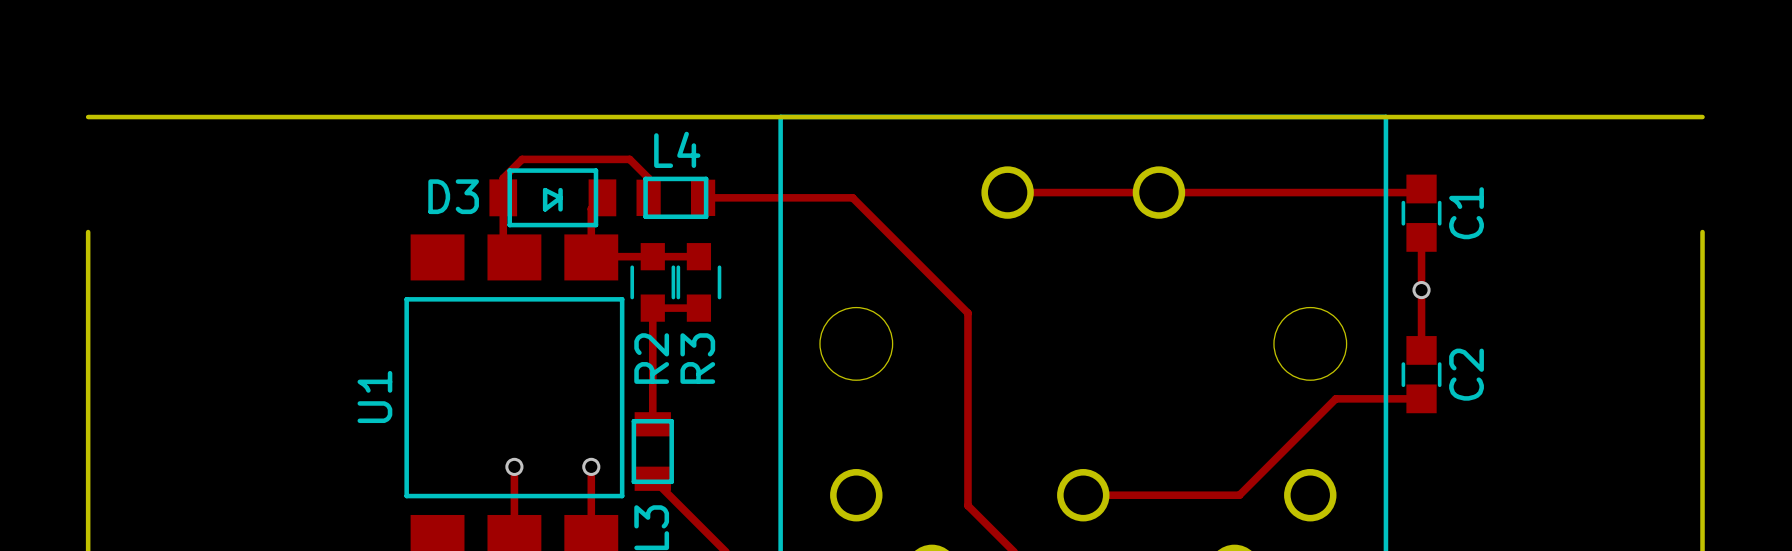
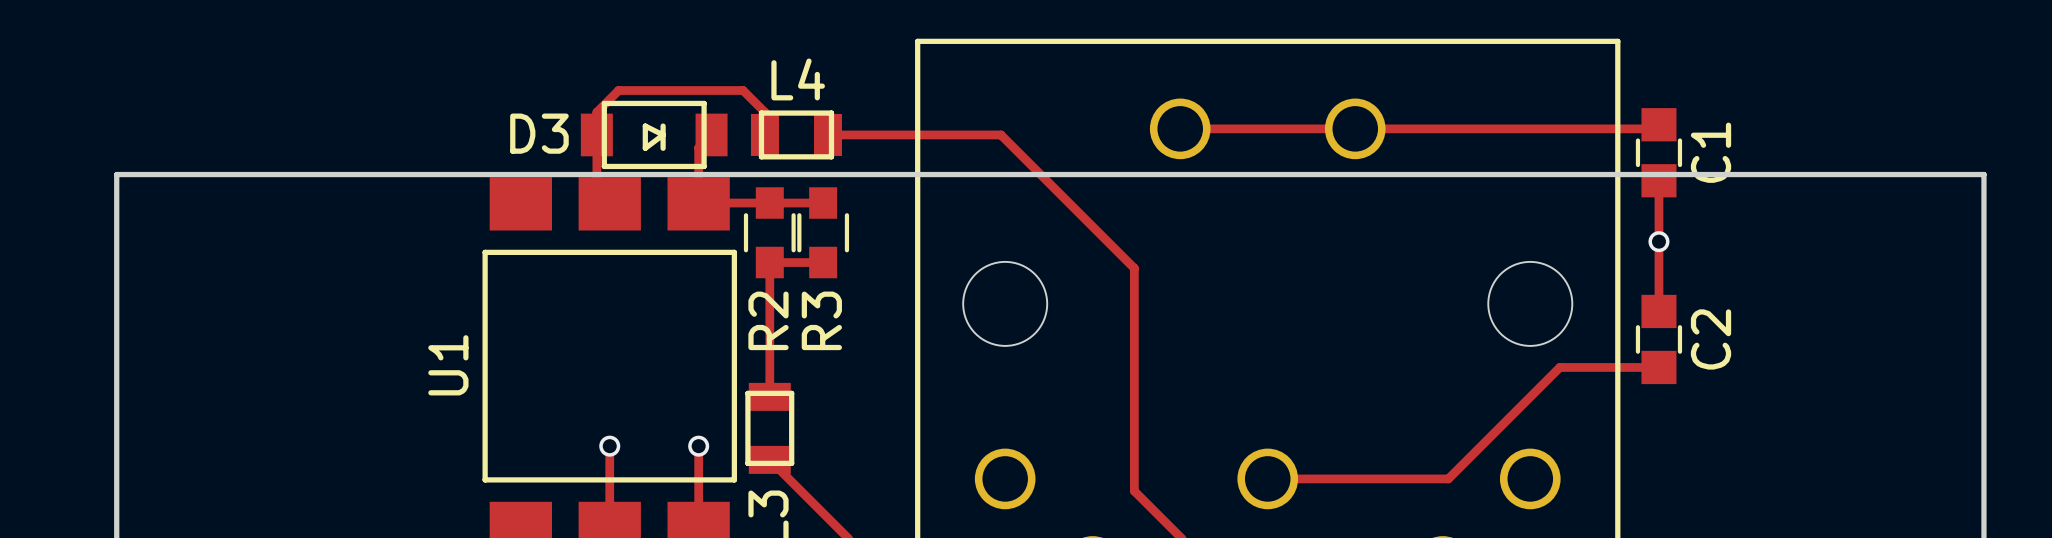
board edge: (88, 117) (1702, 117) -> (116, 174) (1983, 174)

